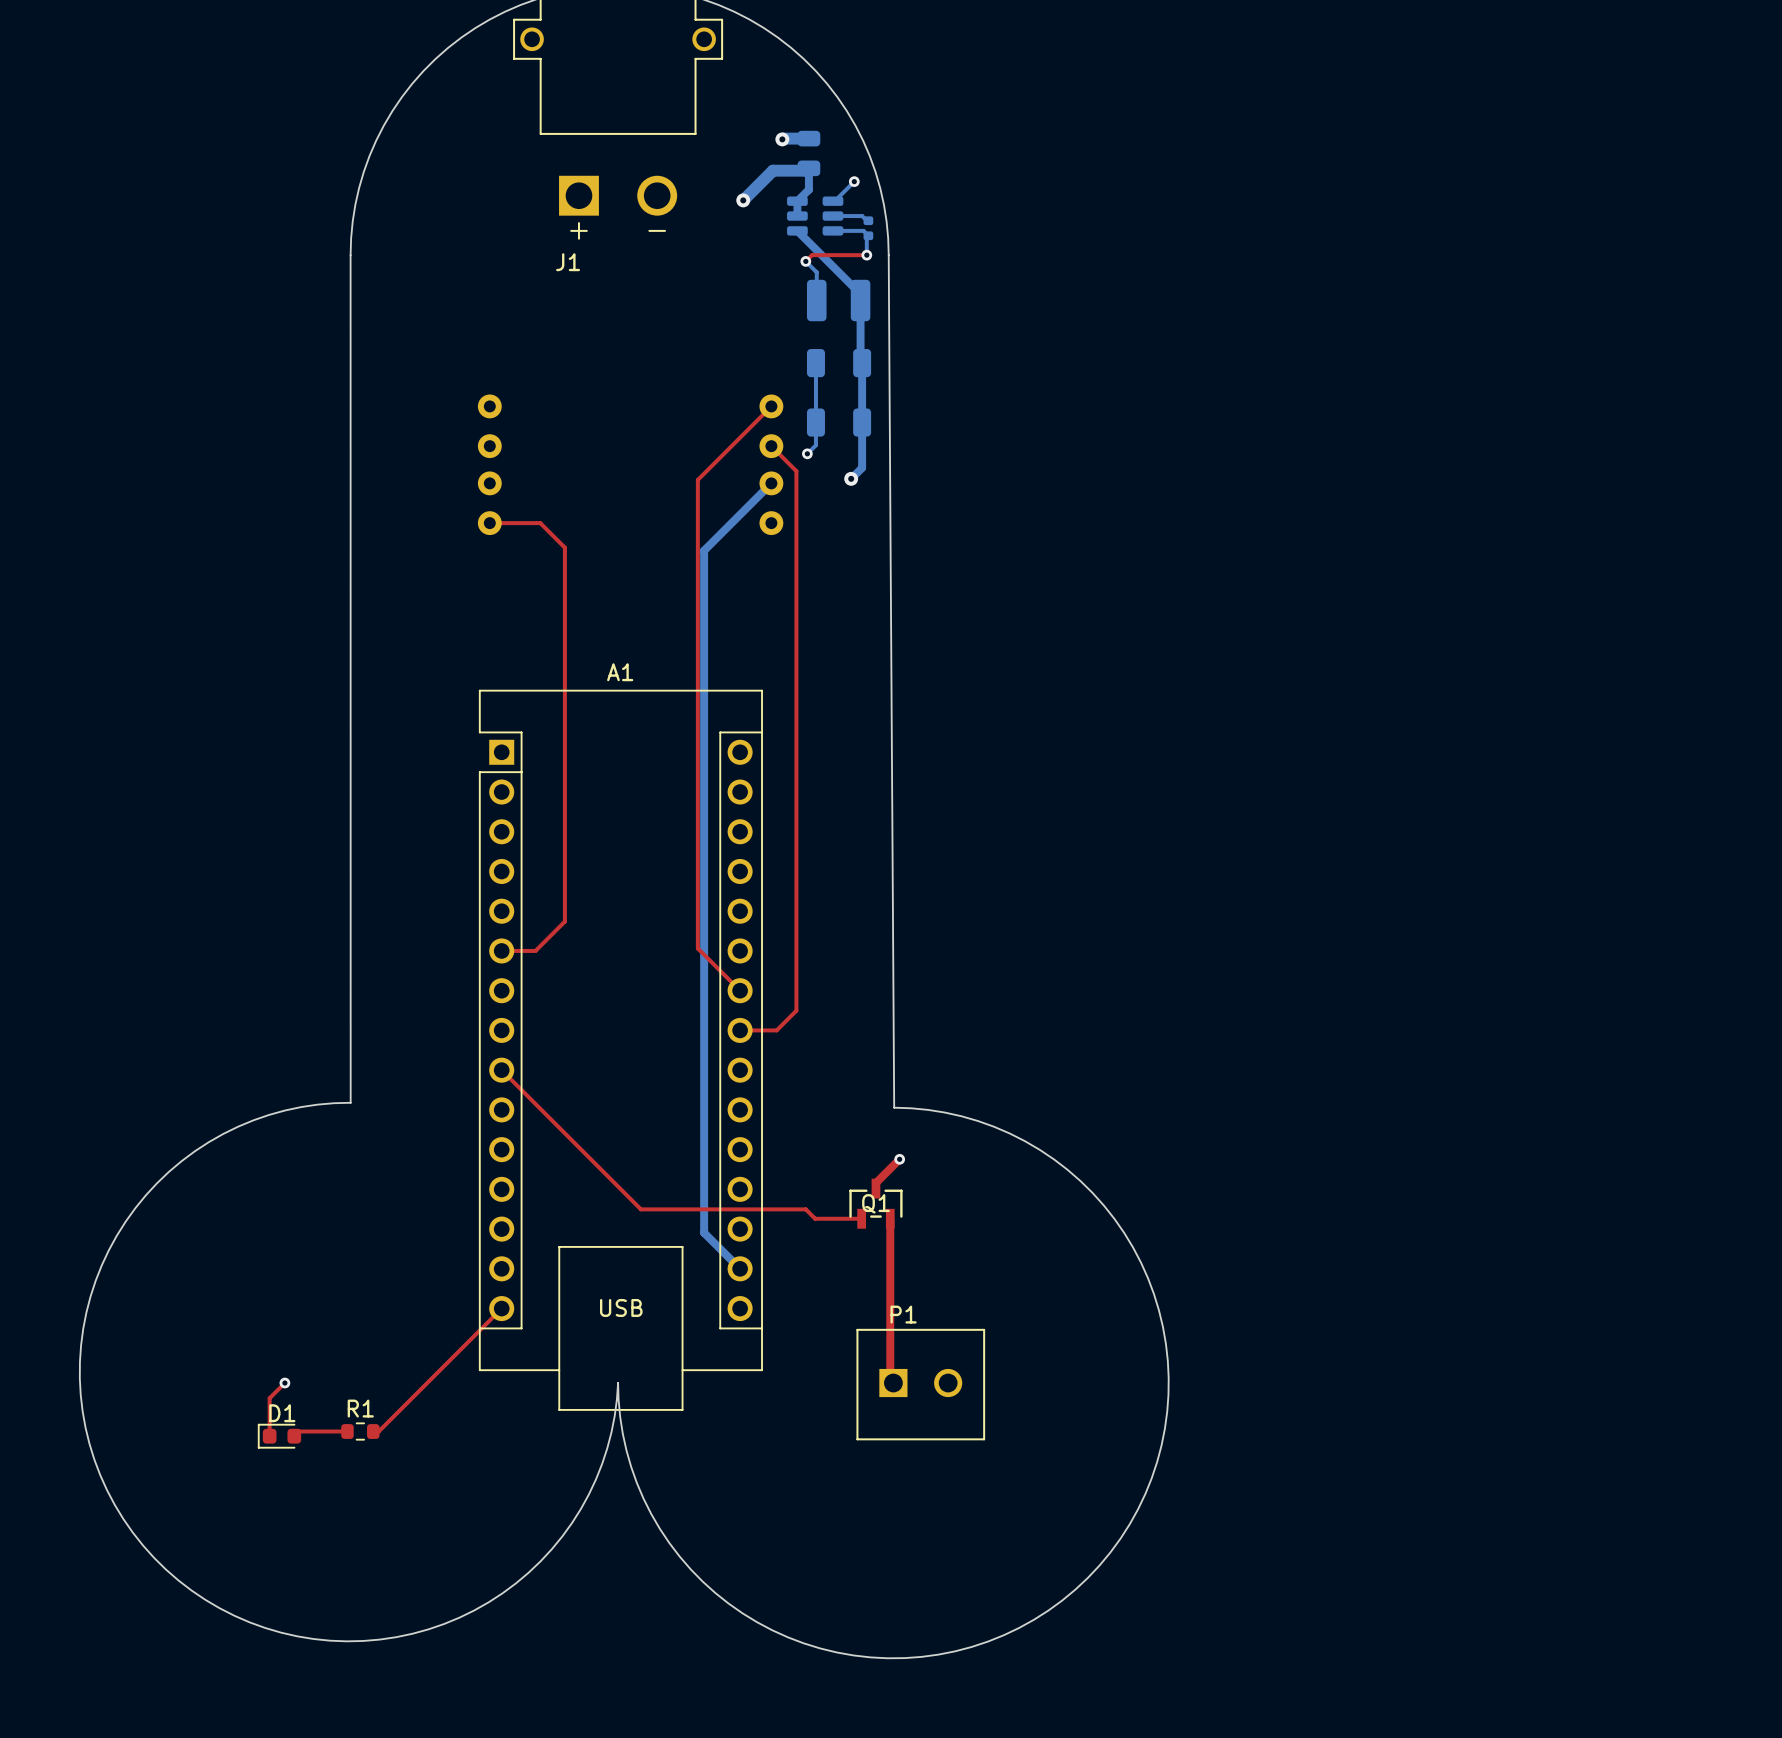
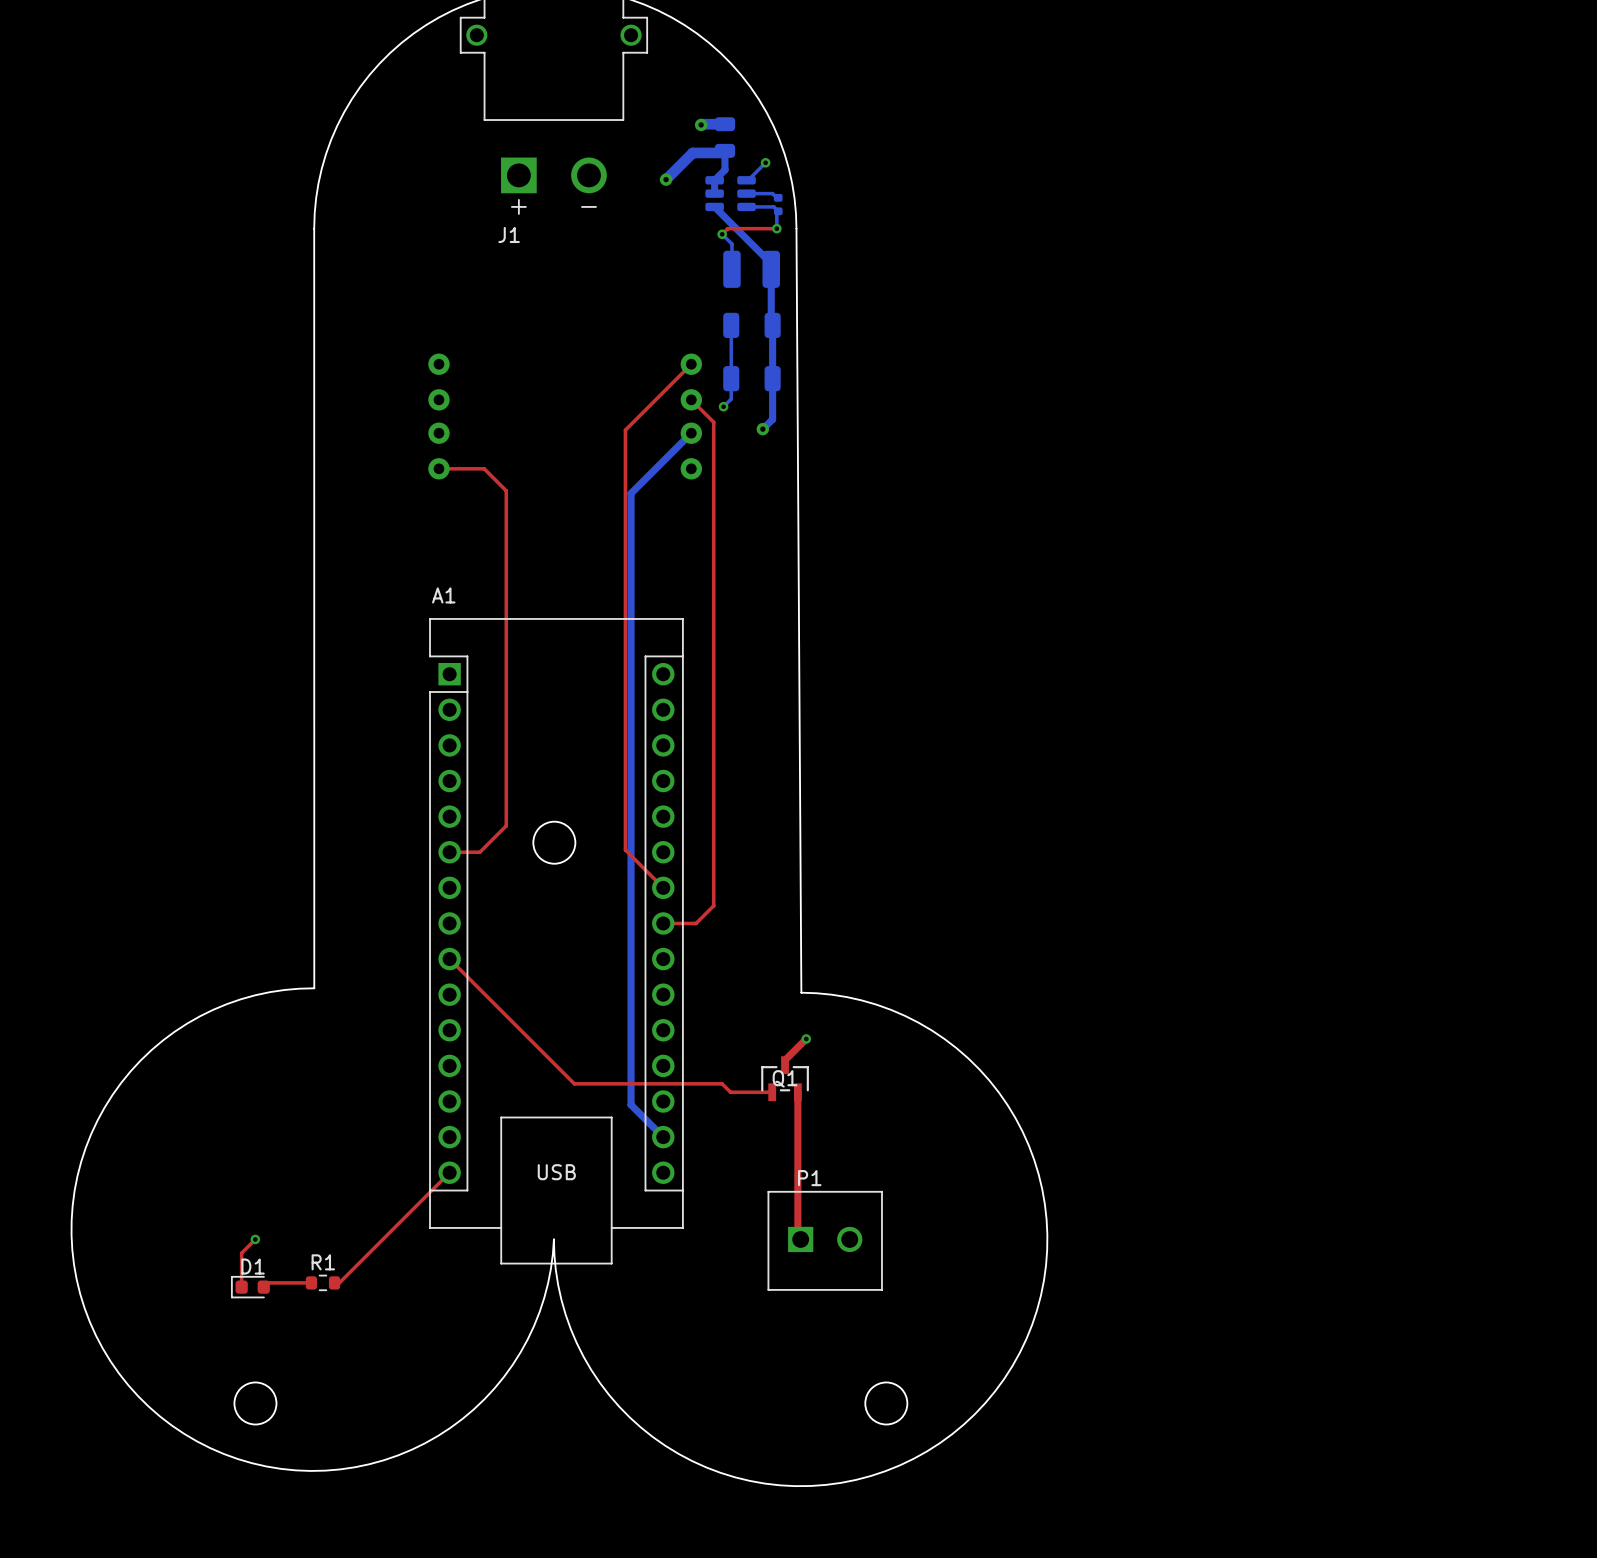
A1 name position: A1 (620, 672) -> A1 (443, 595)
round board edge: none -> [533, 821, 576, 865]
round board edge: none -> [234, 1382, 277, 1425]
round board edge: none -> [865, 1382, 908, 1425]

